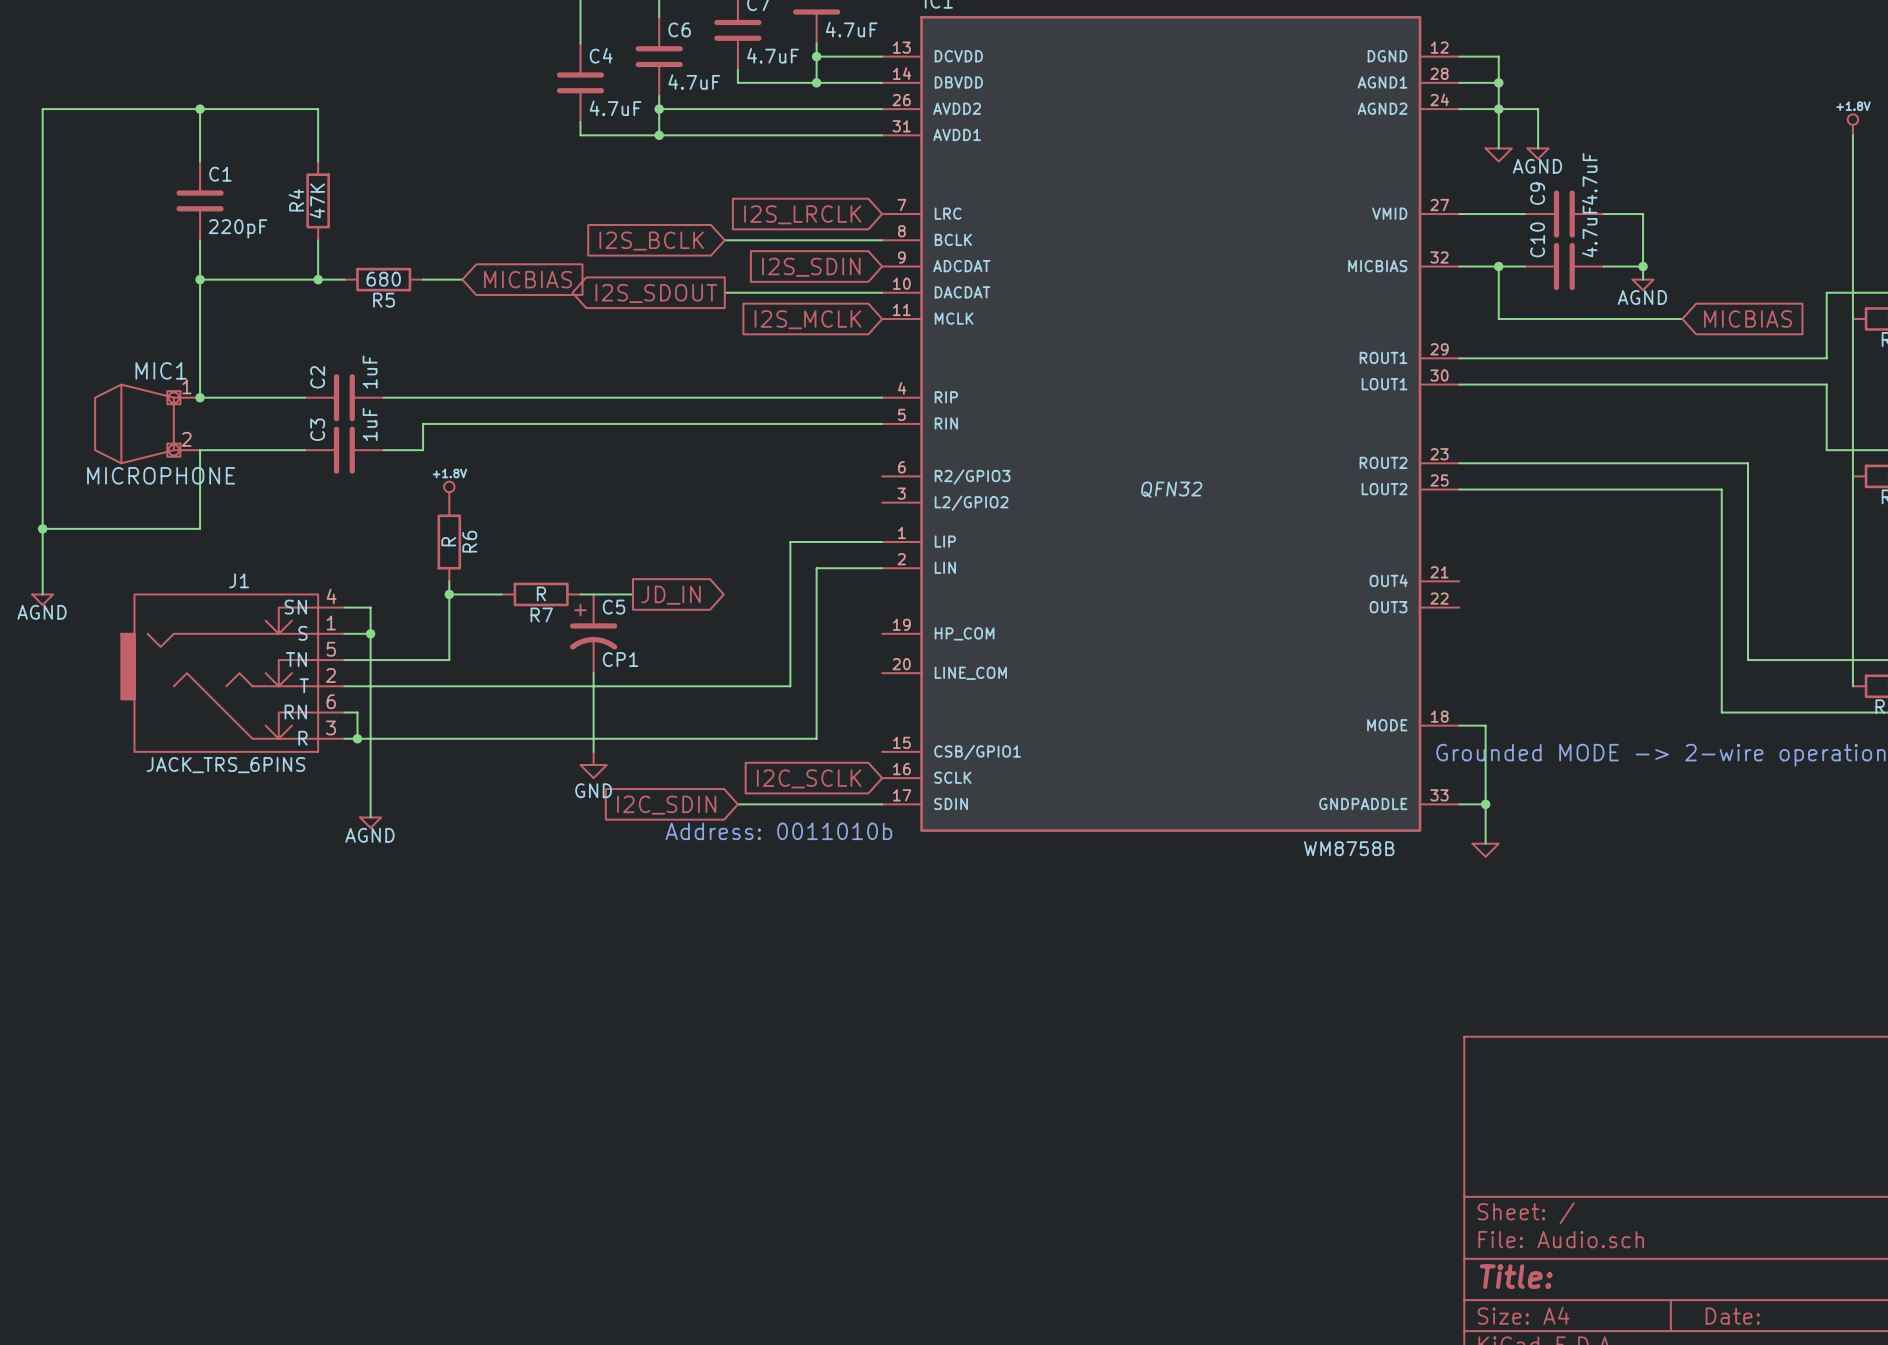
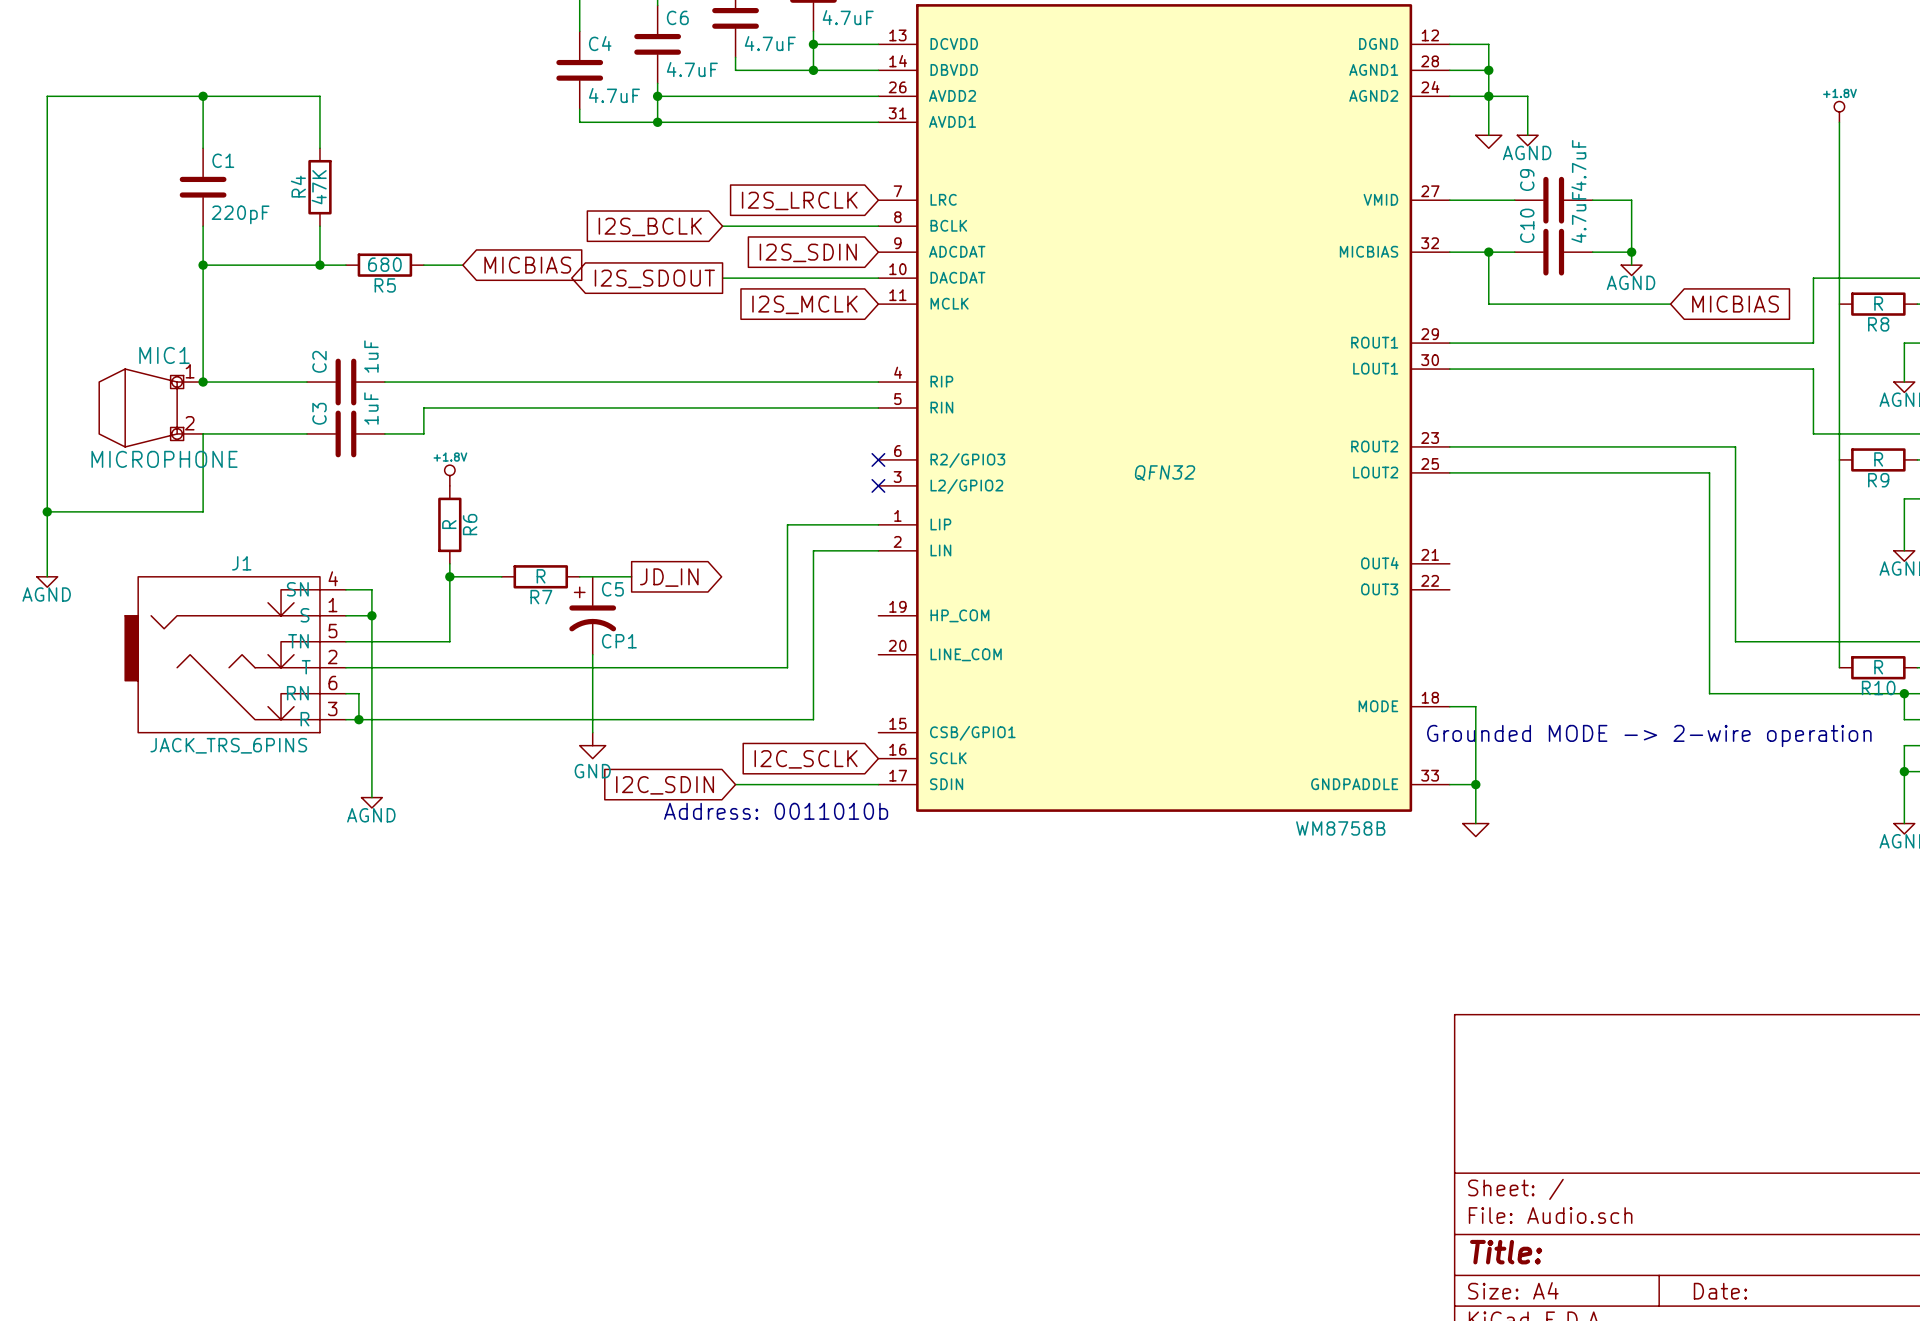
no-connect mark: none -> (878, 459)
no-connect mark: none -> (878, 485)

